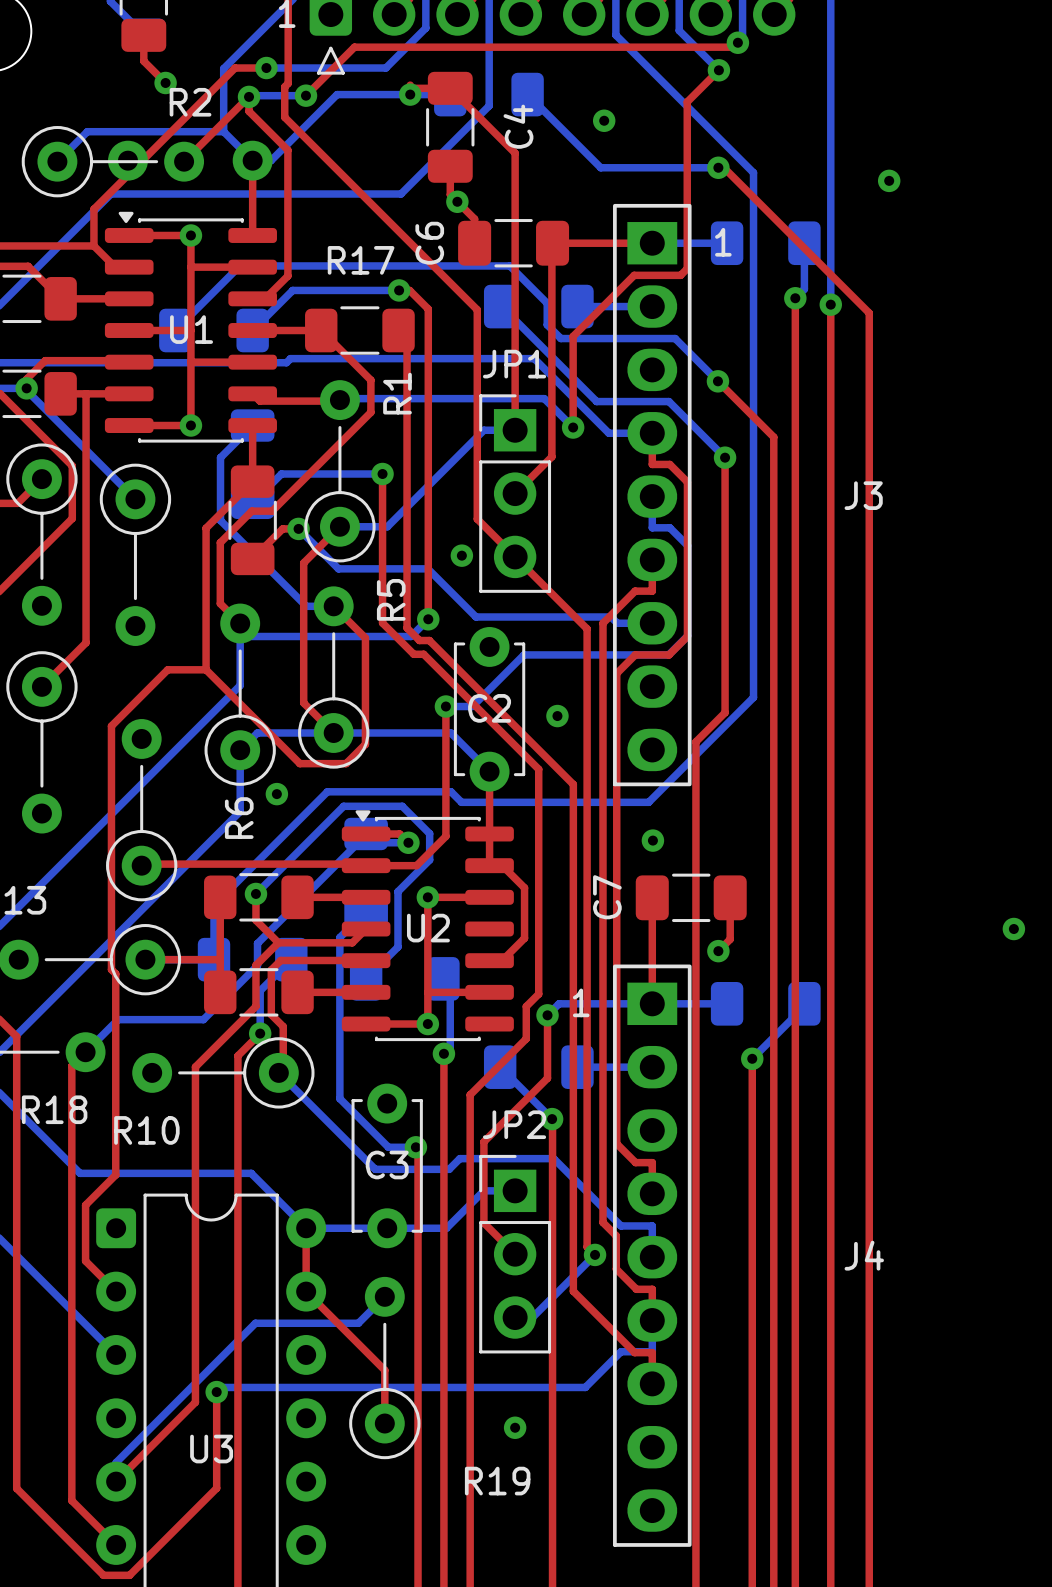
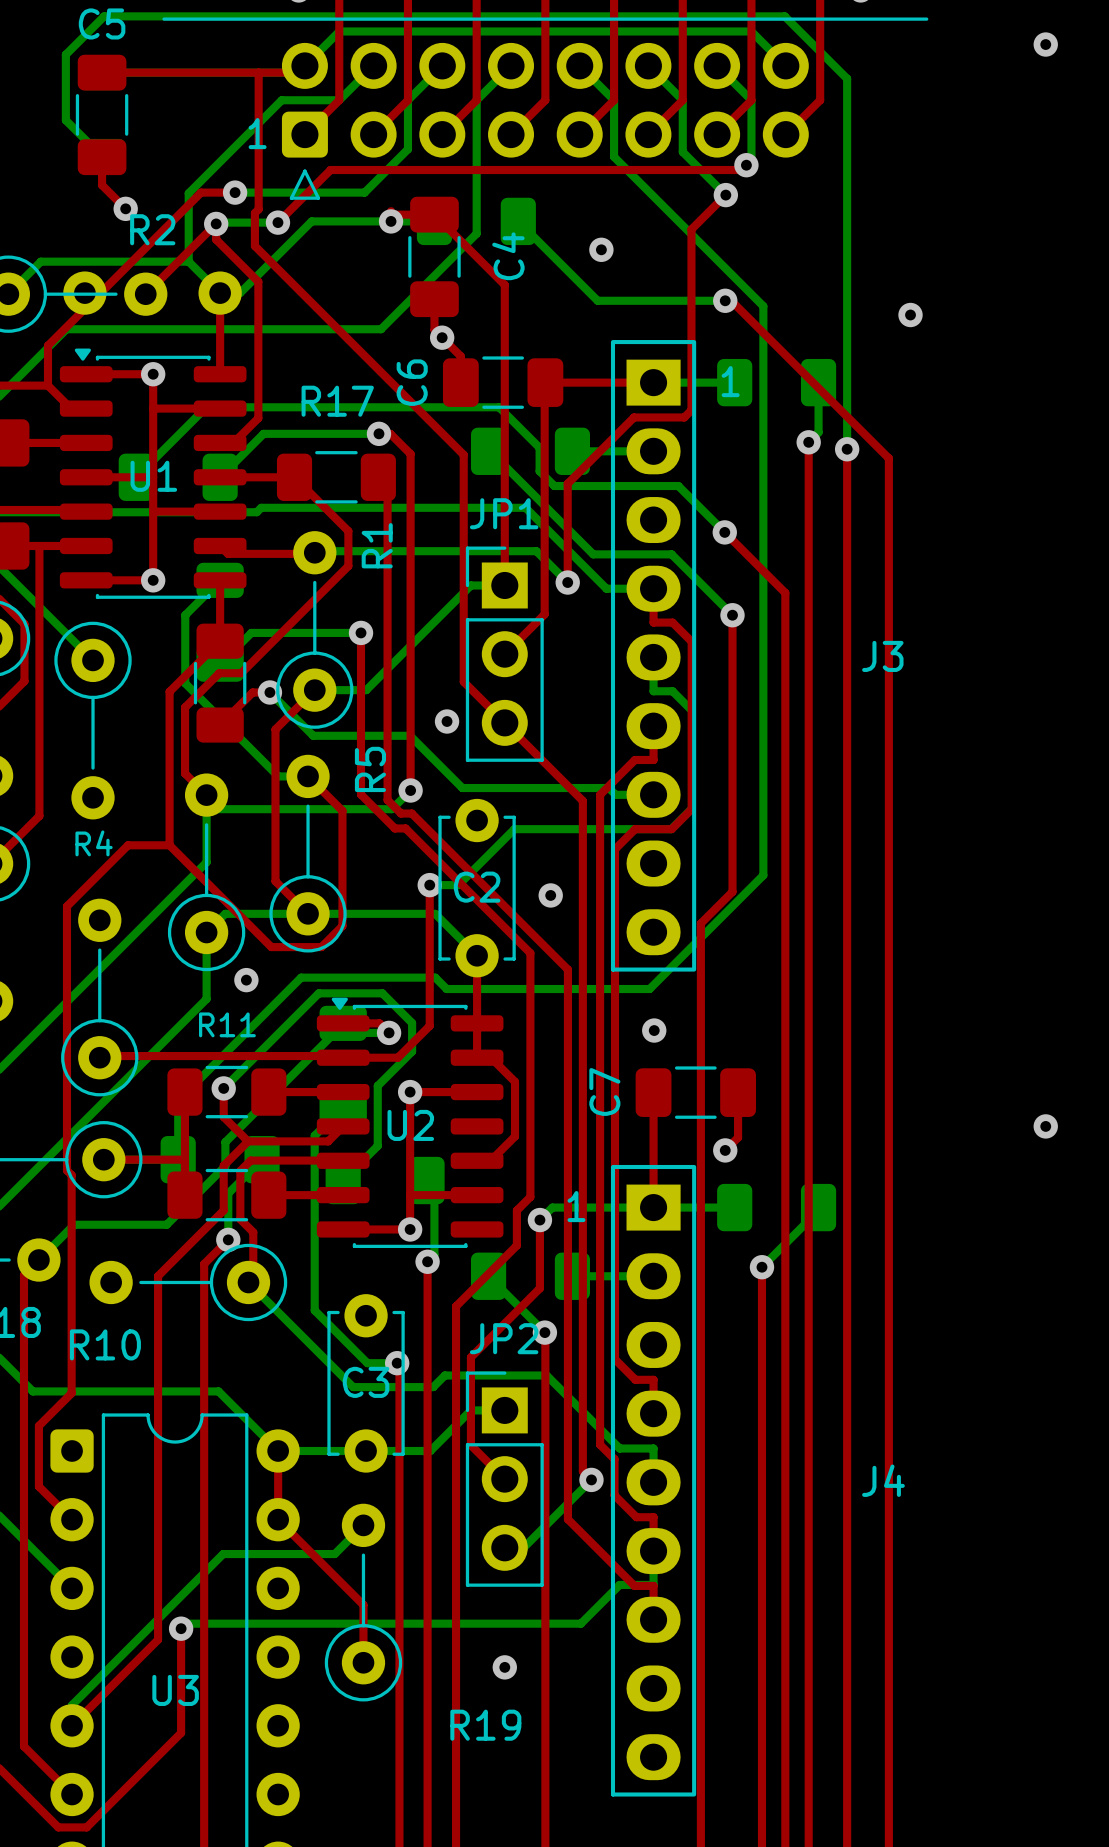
R4 name: none -> R4 (94, 843)
R6 name: R6 (239, 818) -> none
R11 name: none -> R11 (227, 1024)

